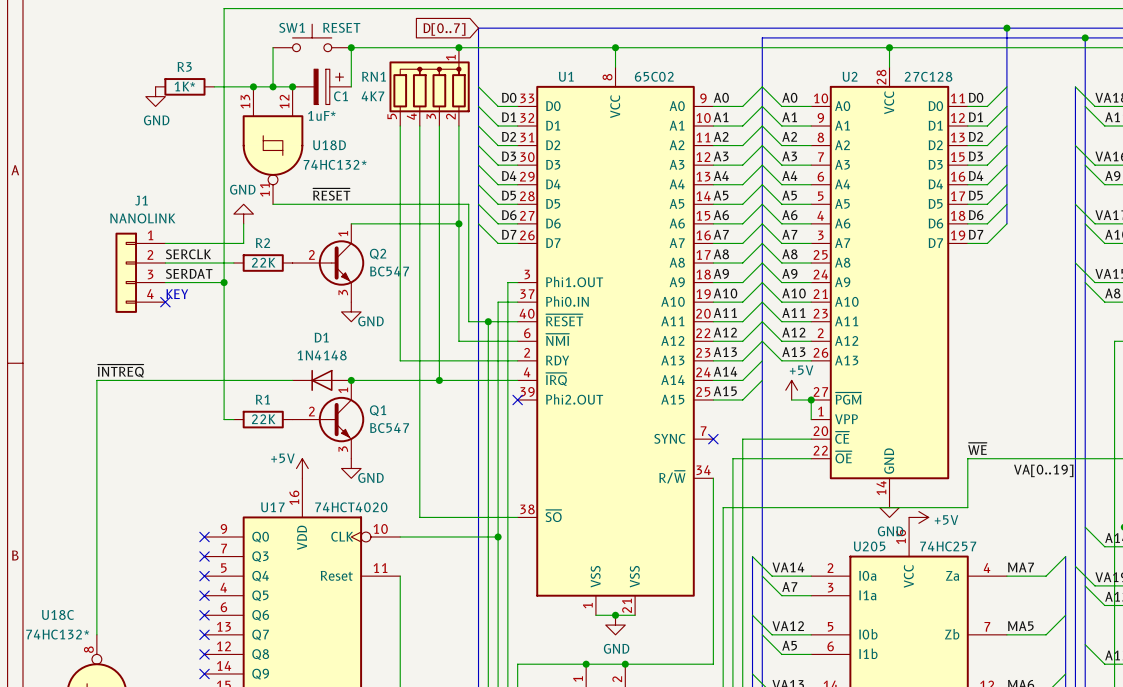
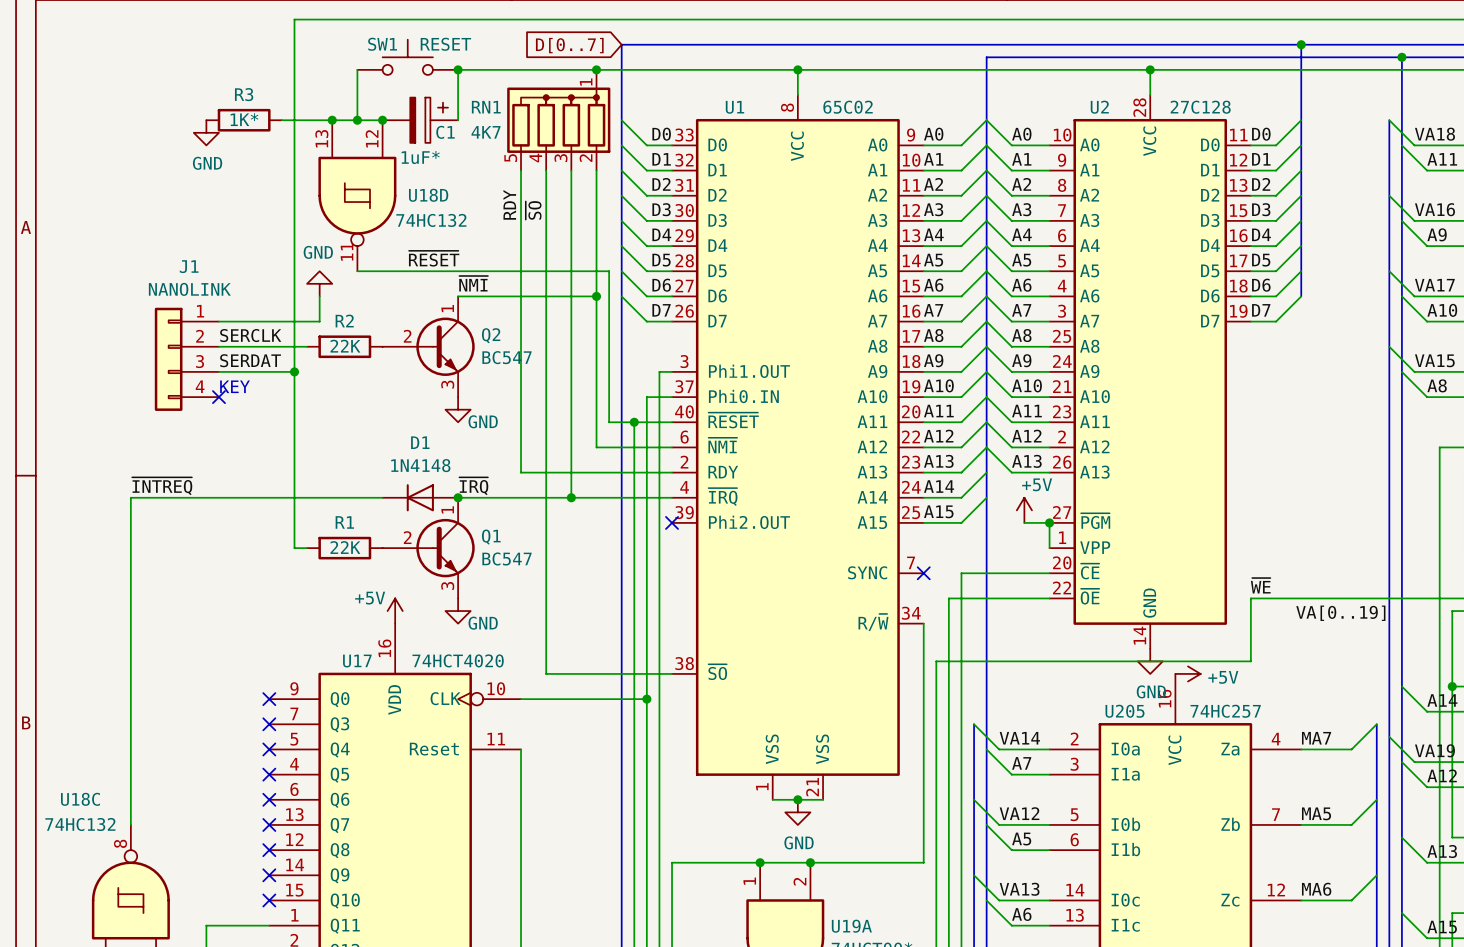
label: none -> RDY (509, 204)
label: none -> ~{SO} (533, 210)
U18D value: 74HC132* (335, 164) -> 74HC132 (431, 220)
label: none -> ~{NMI} (473, 283)
label: none -> ~{IRQ} (473, 486)
U18C value: 74HC132* (57, 634) -> 74HC132 (80, 824)

